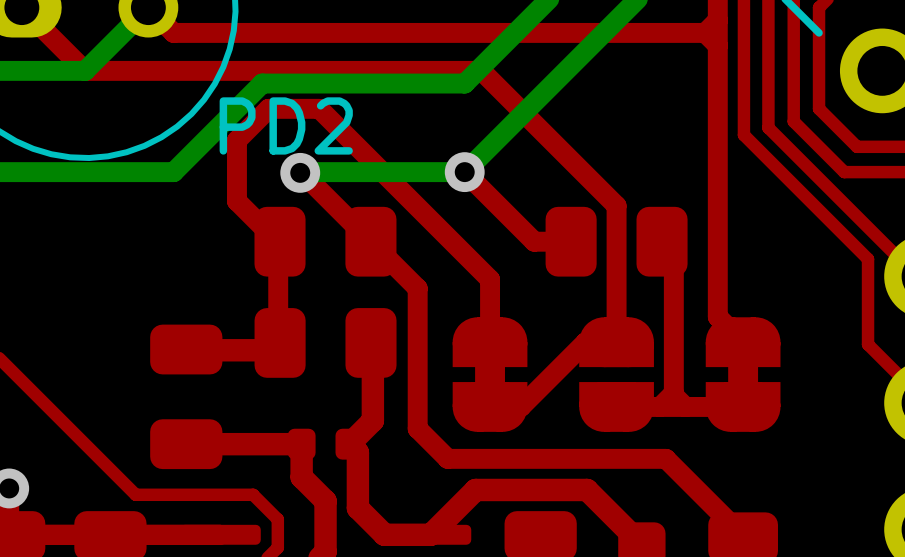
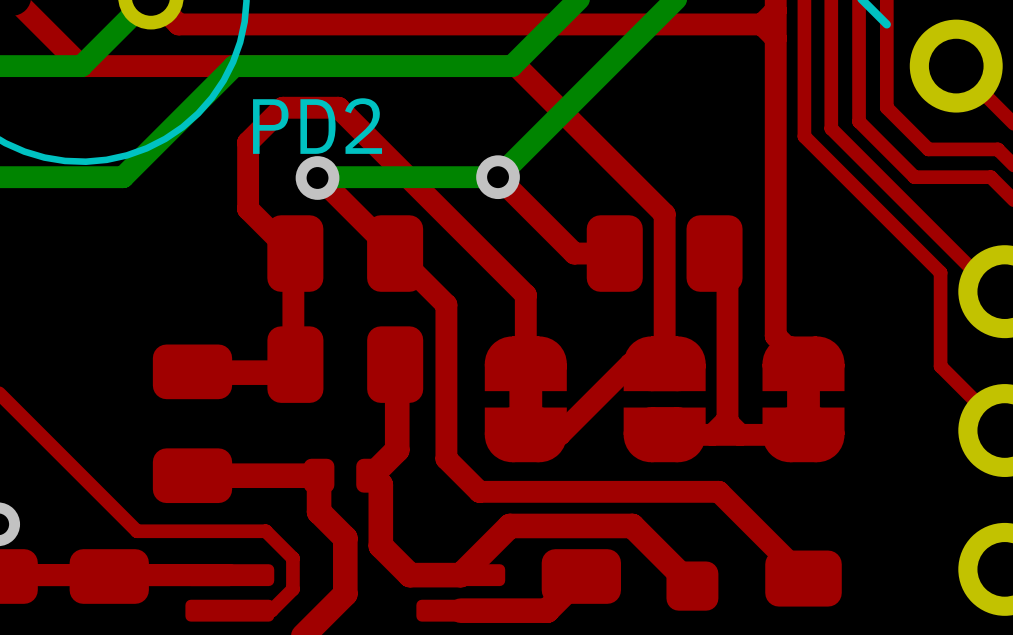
bottom track: (477, 70) (464, 83) (262, 83) (173, 172) (123, 172) -> (511, 66) (234, 66) (123, 177)

